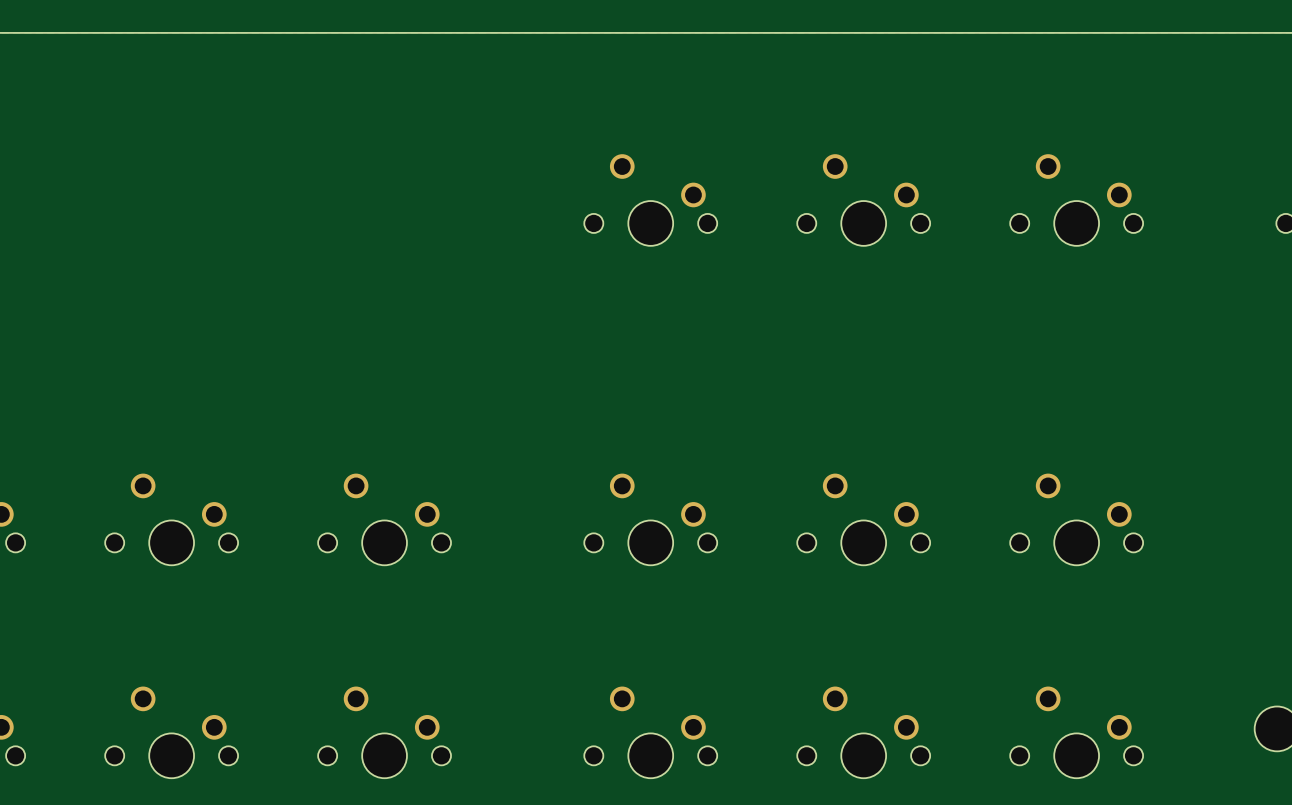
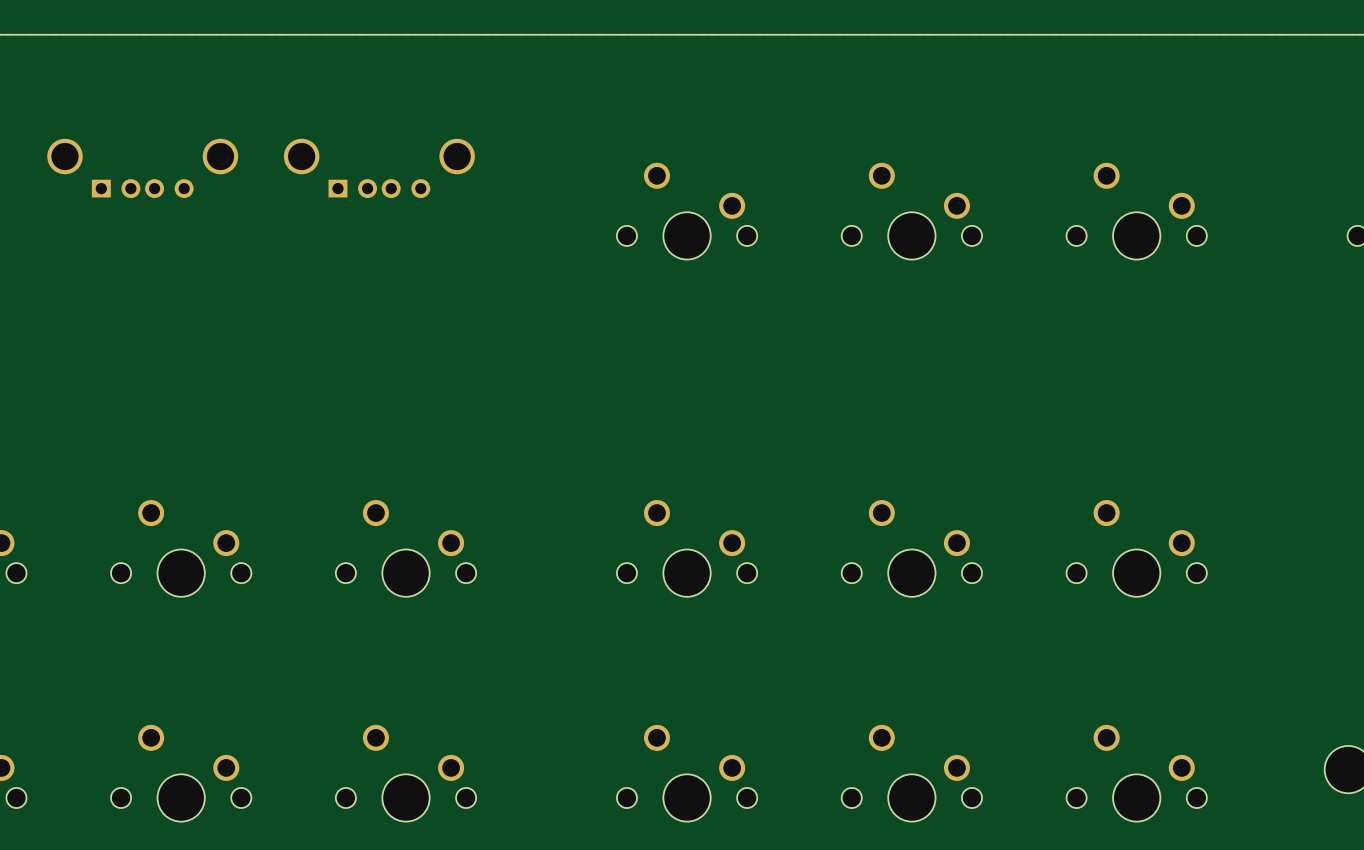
part: none -> (142, 168)
part: none -> (379, 168)

